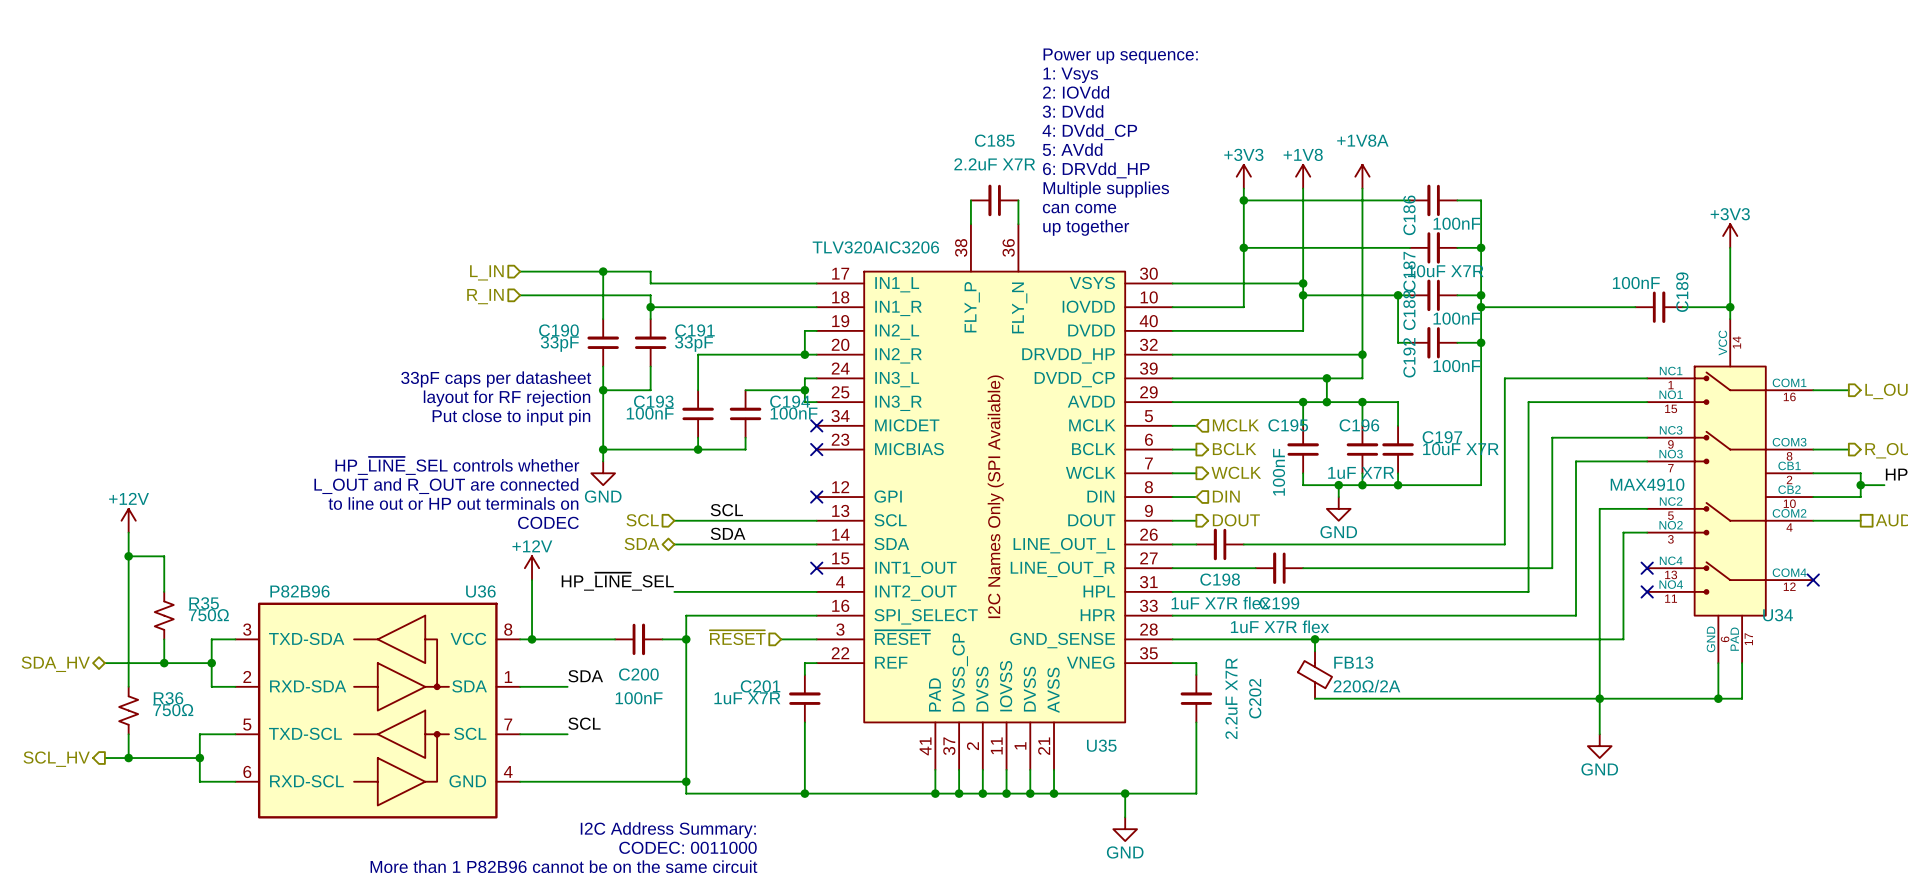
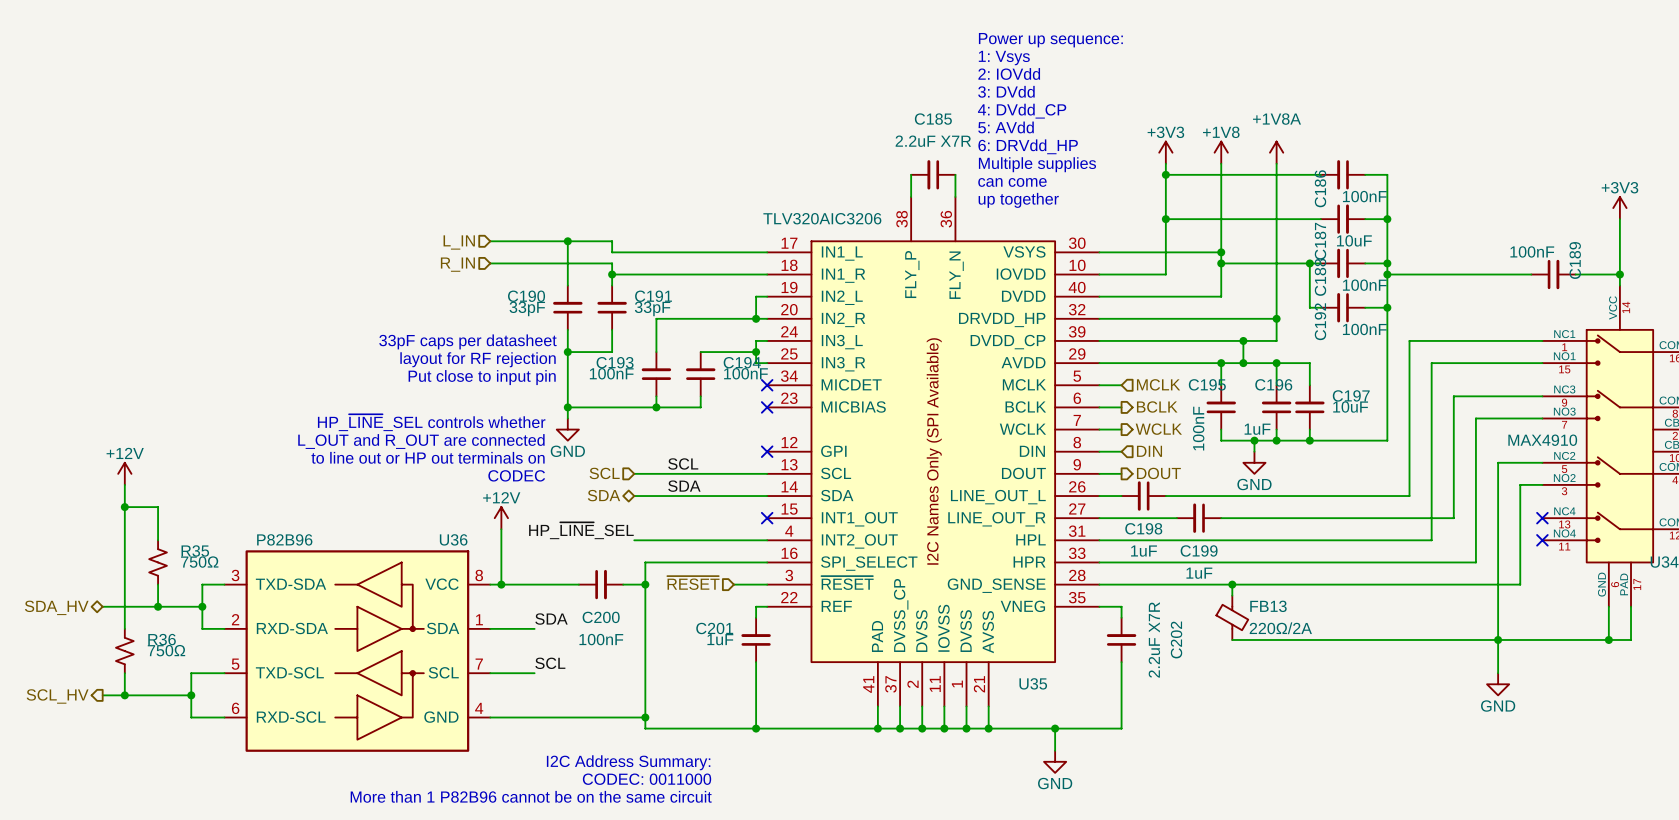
C187 value: 10uF X7R (1445, 271) -> 10uF (1354, 240)
C197 value: 10uF X7R (1460, 449) -> 10uF (1350, 407)
C196 value: 1uF X7R (1361, 472) -> 1uF (1257, 429)
C198 value: 1uF X7R flex (1220, 603) -> 1uF (1144, 551)
C199 value: 1uF X7R flex (1279, 626) -> 1uF (1199, 573)
C201 value: 1uF X7R (747, 698) -> 1uF (720, 639)

